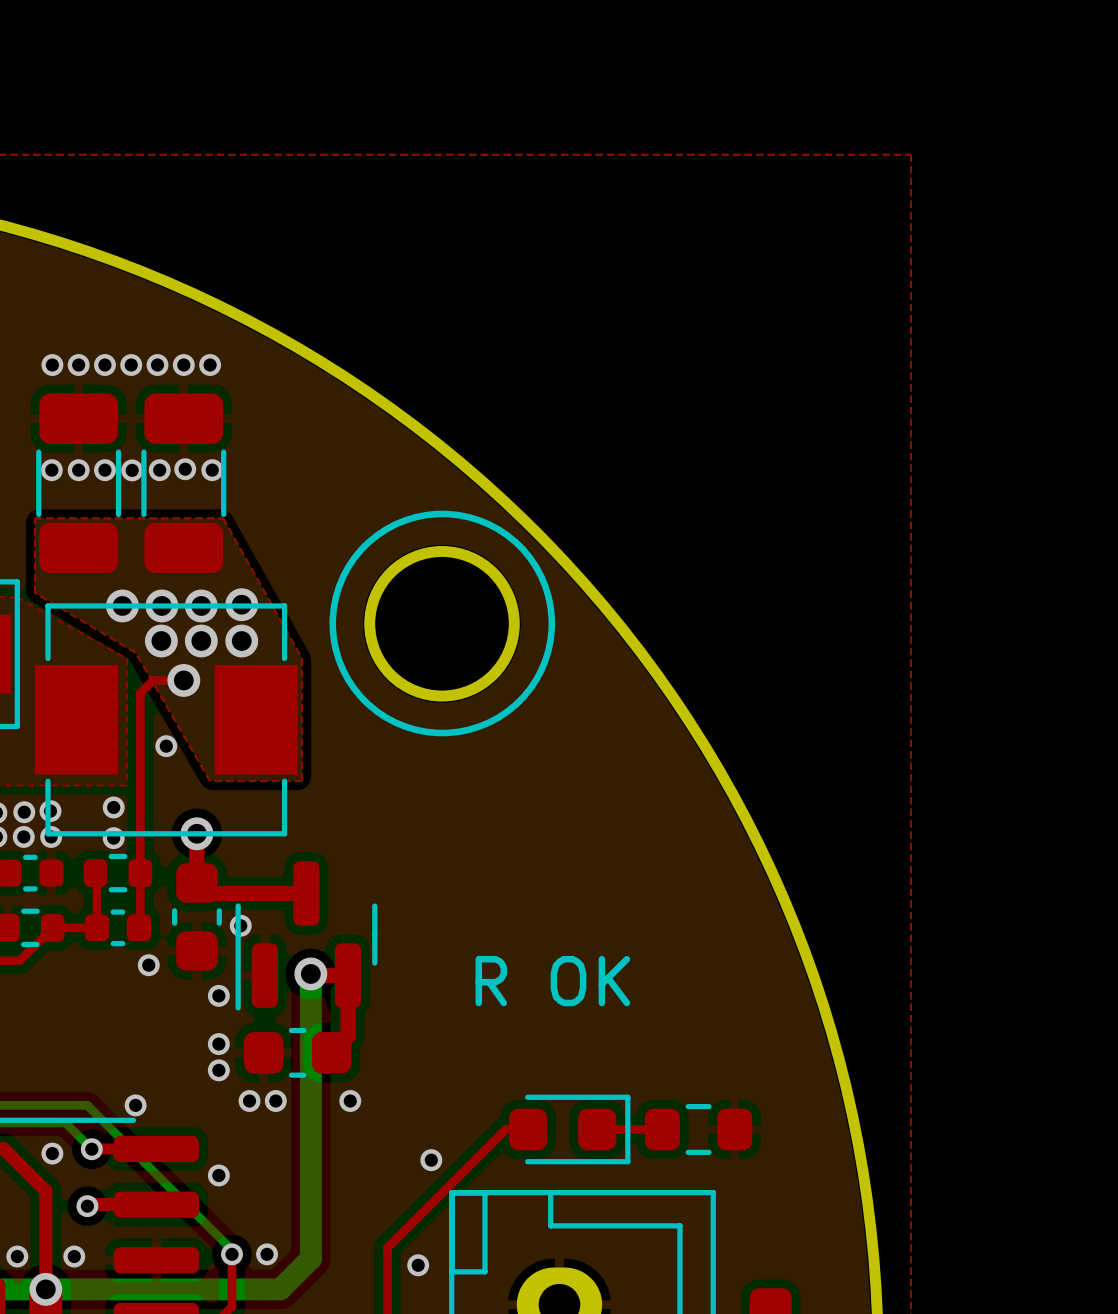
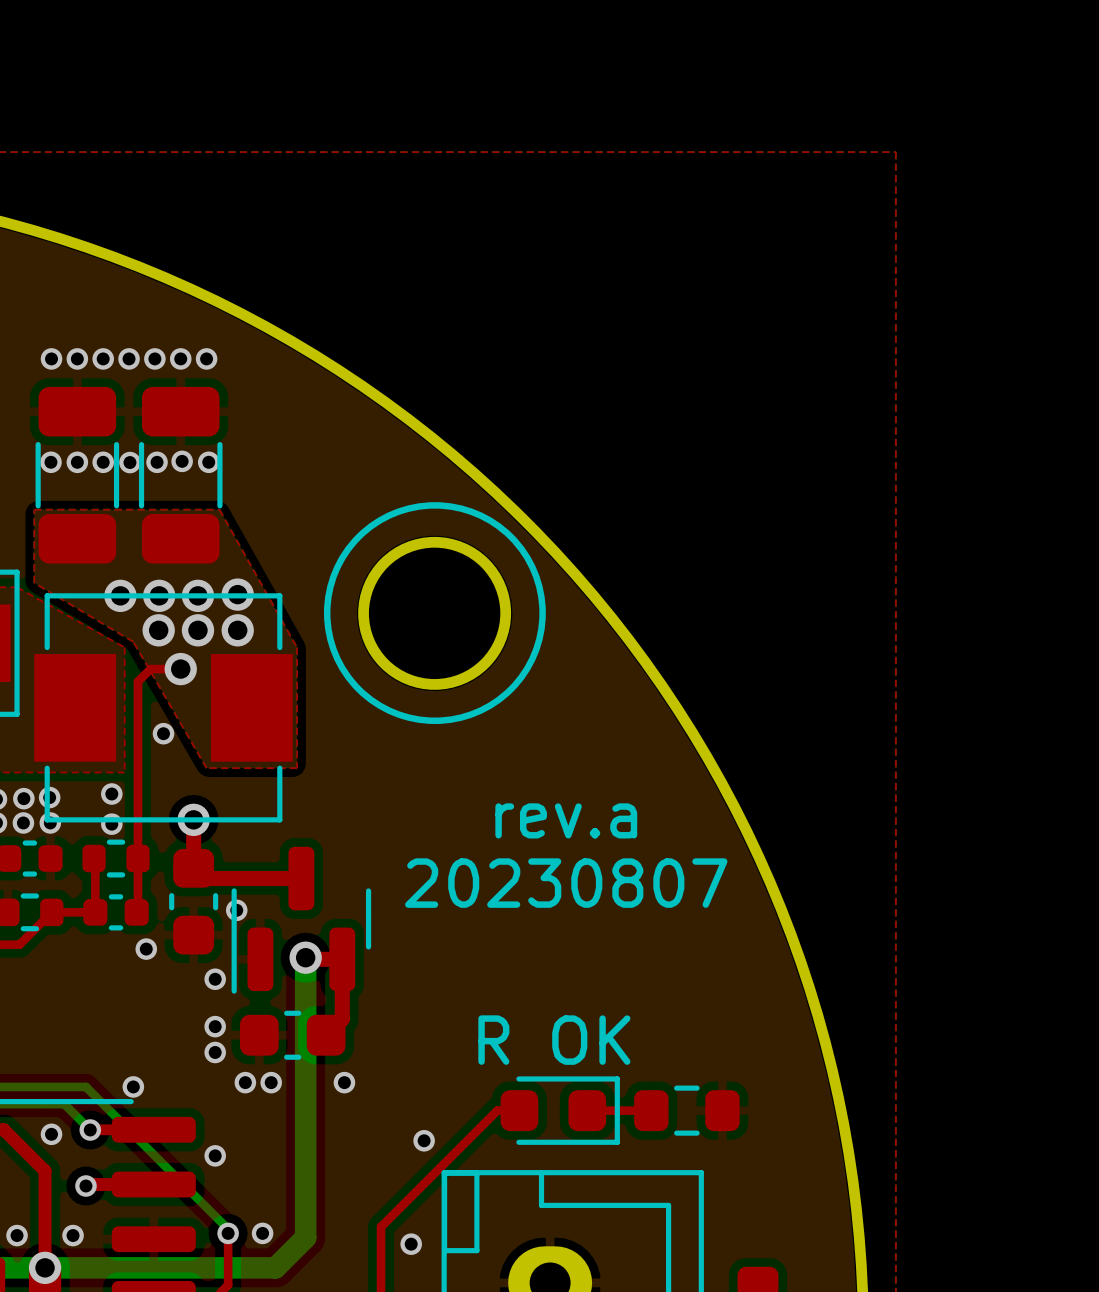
text: none -> rev.a (566, 820)
text: none -> 20230807 (566, 883)
text position: R OK (552, 981) -> R OK (554, 1040)

